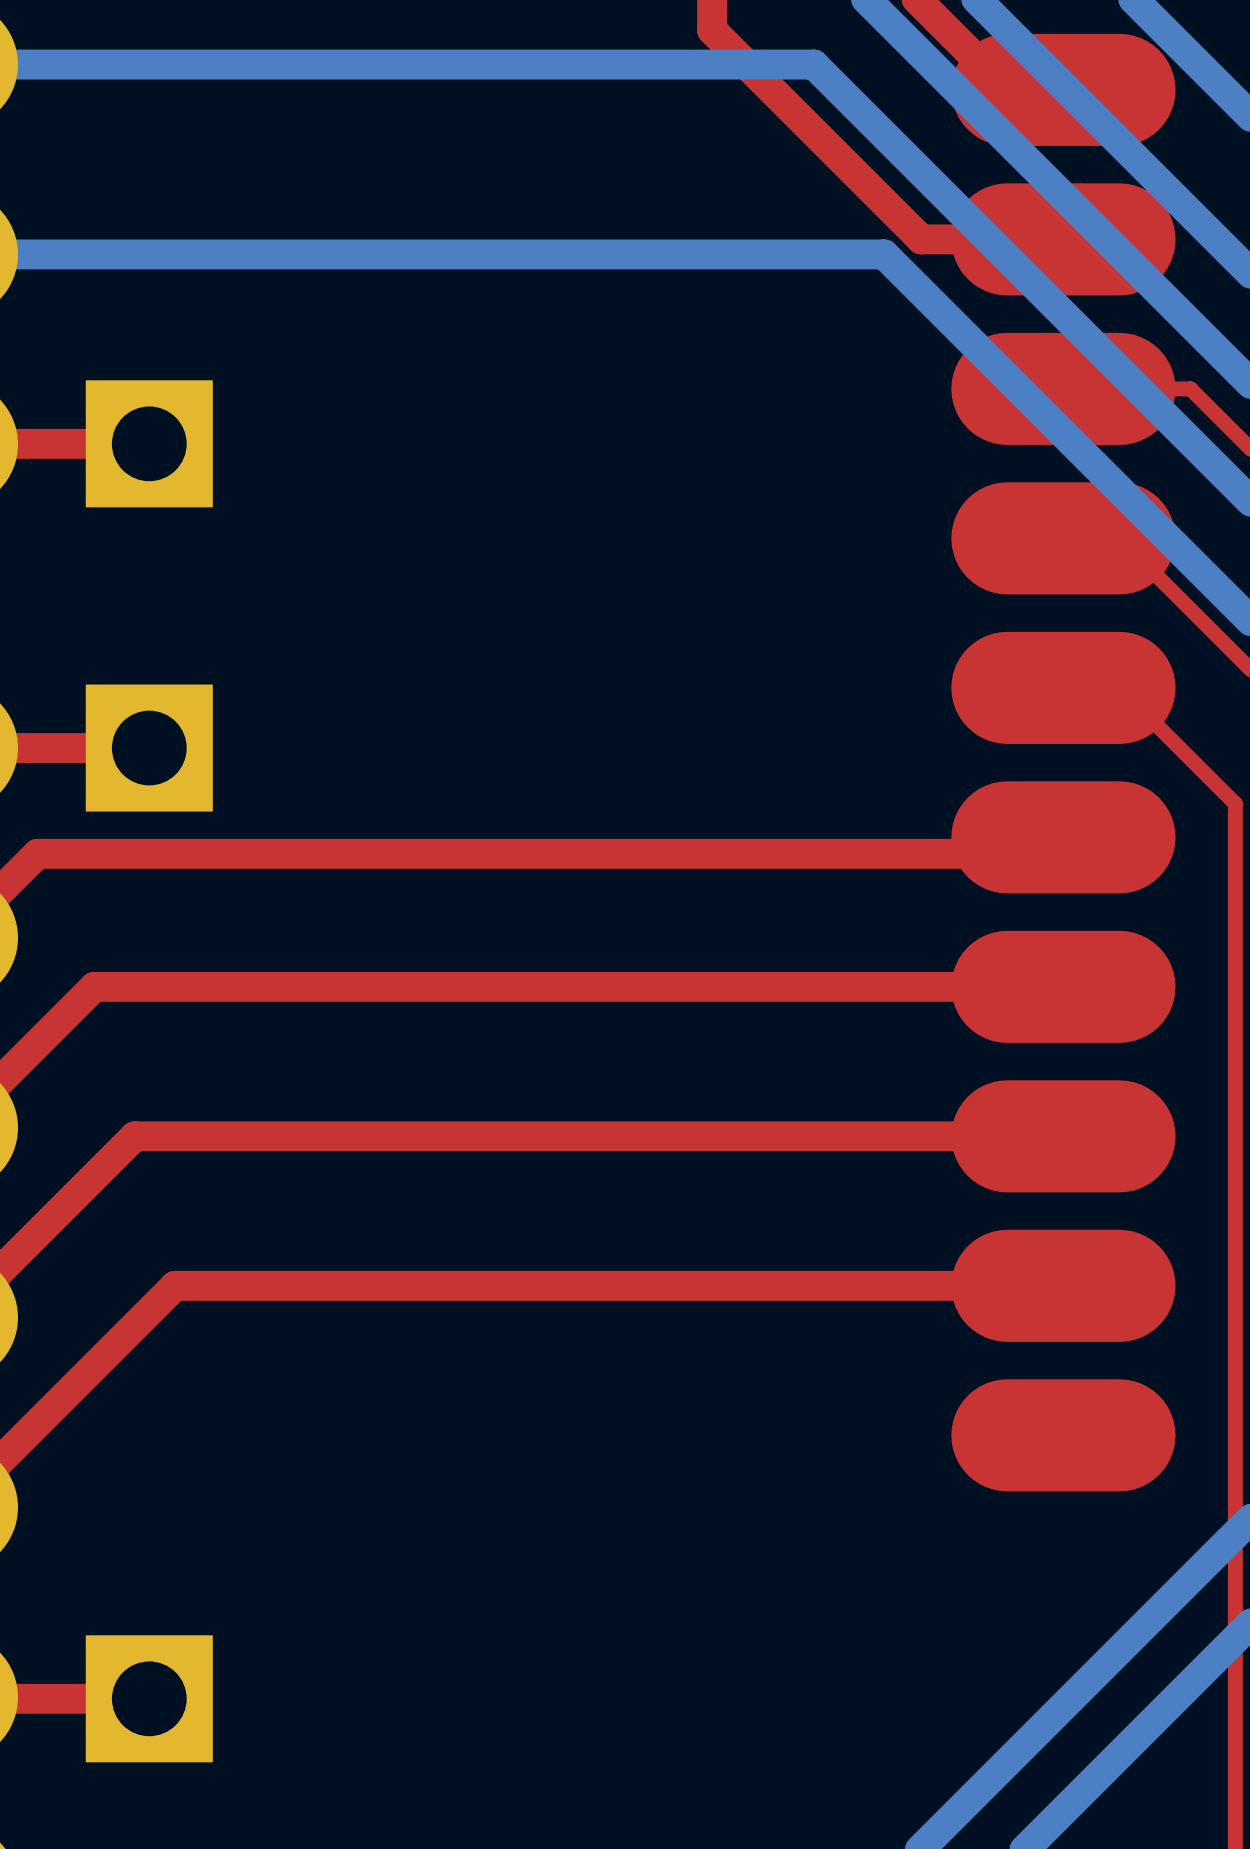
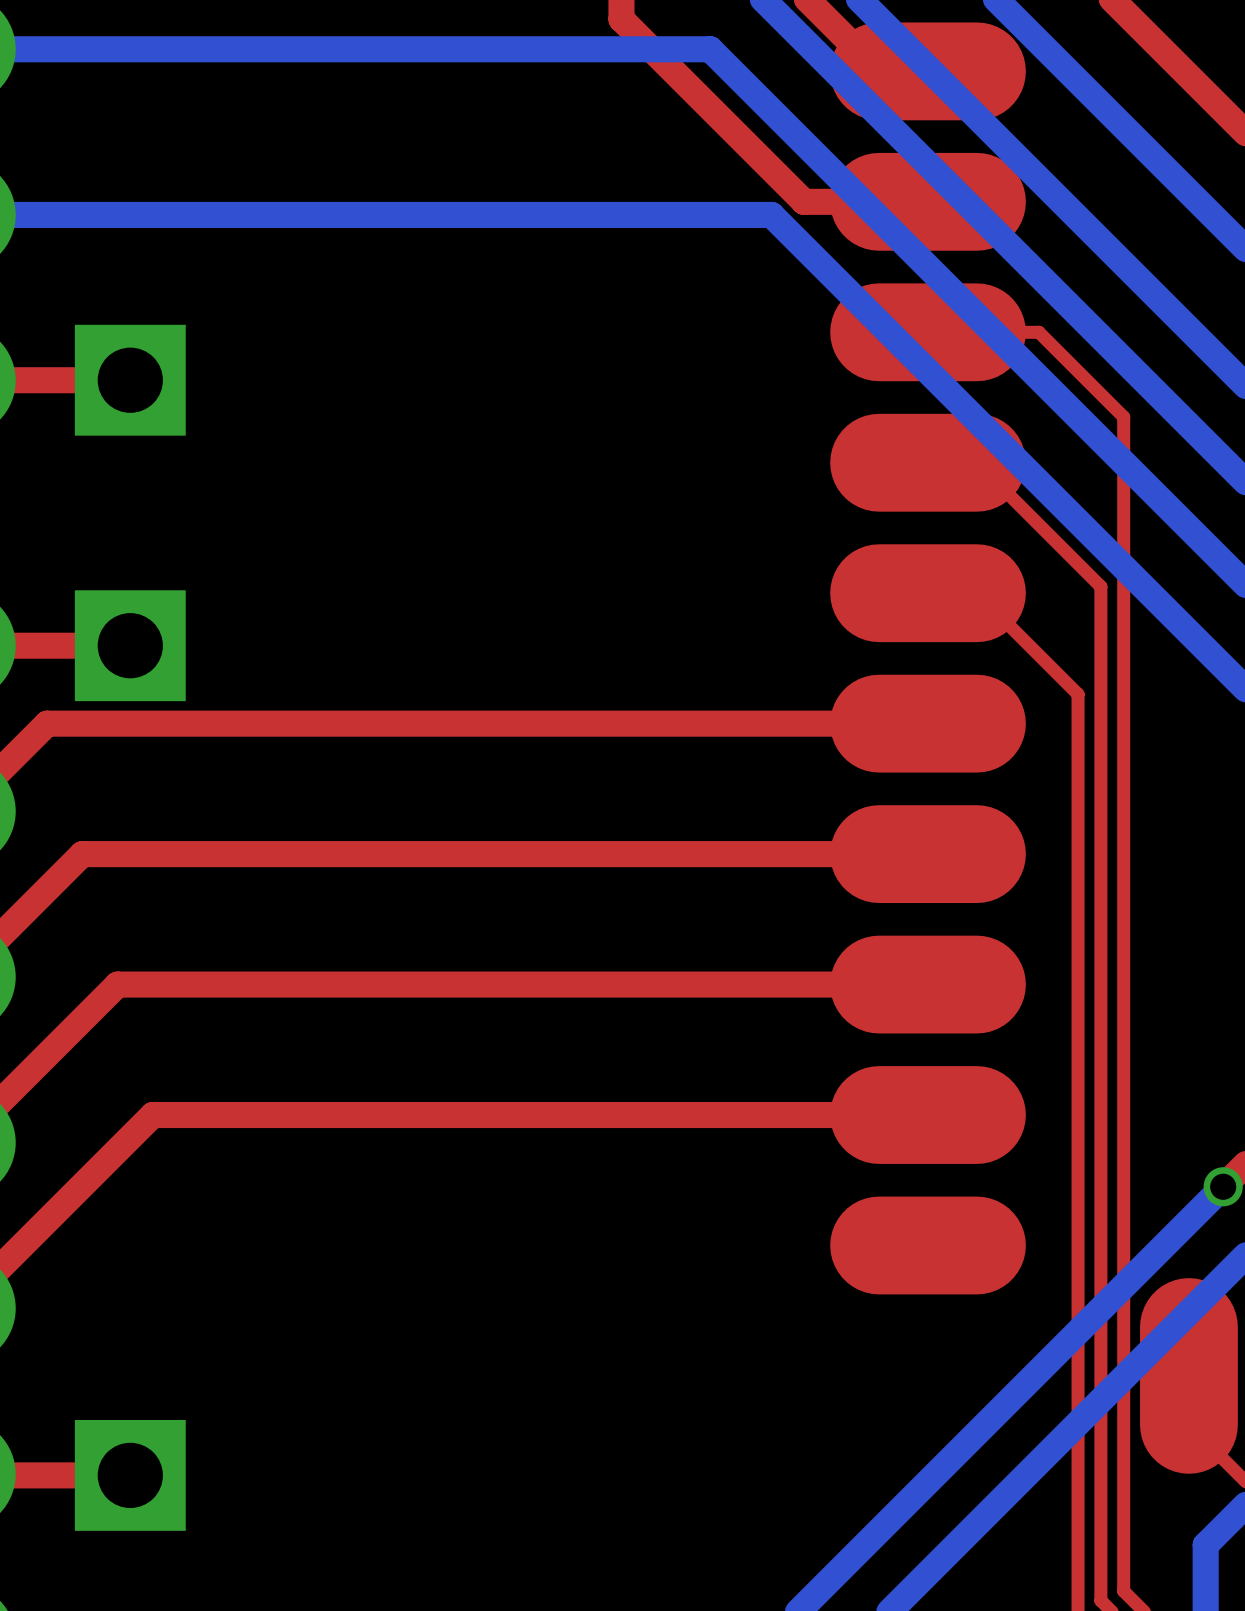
top track: (1063, 837) (1046, 853) (37, 853) -> (928, 723) (47, 723) (32, 738)

